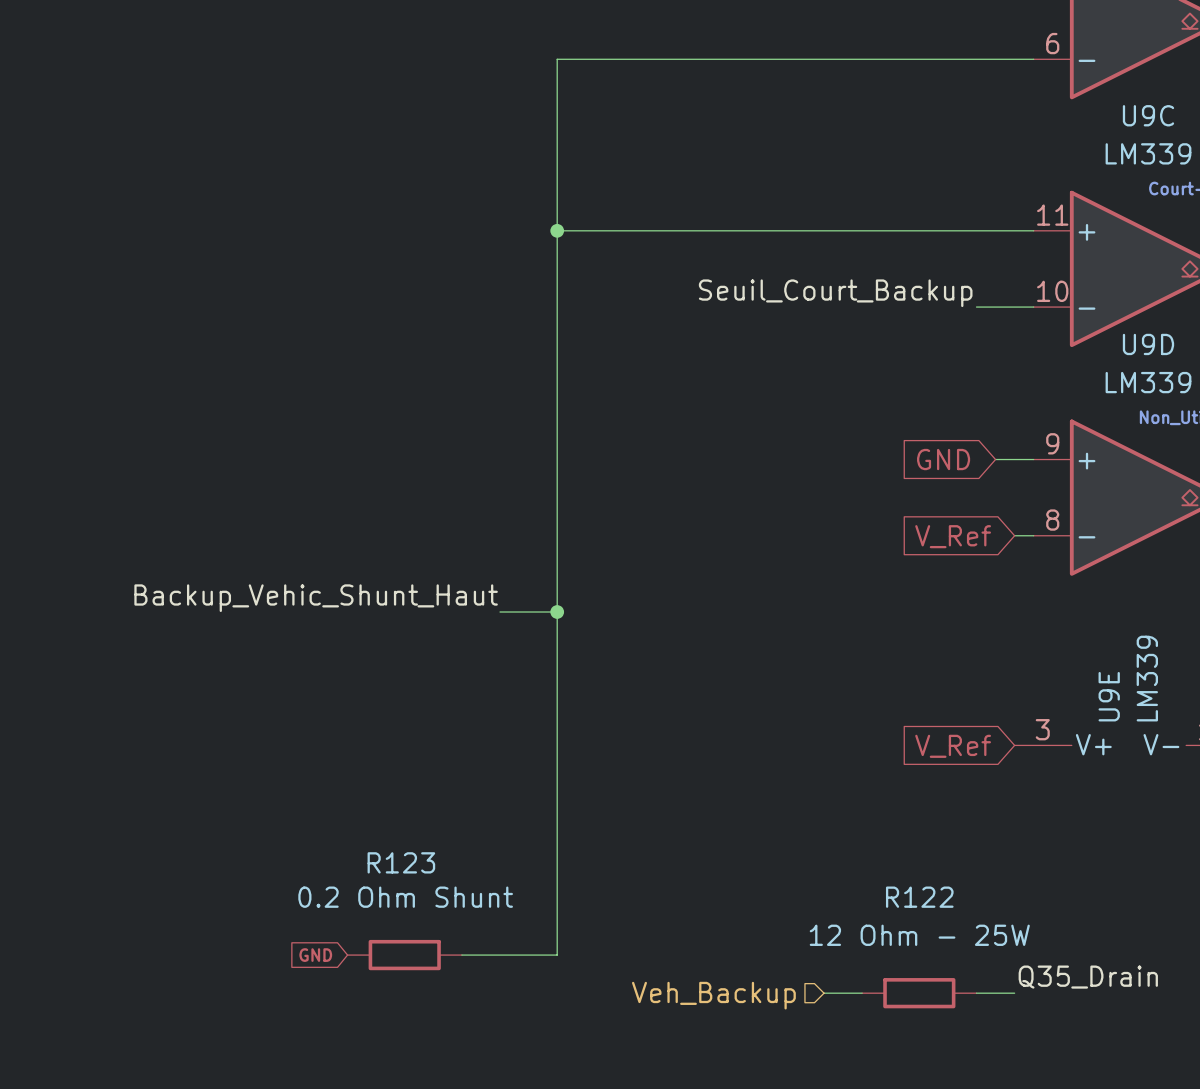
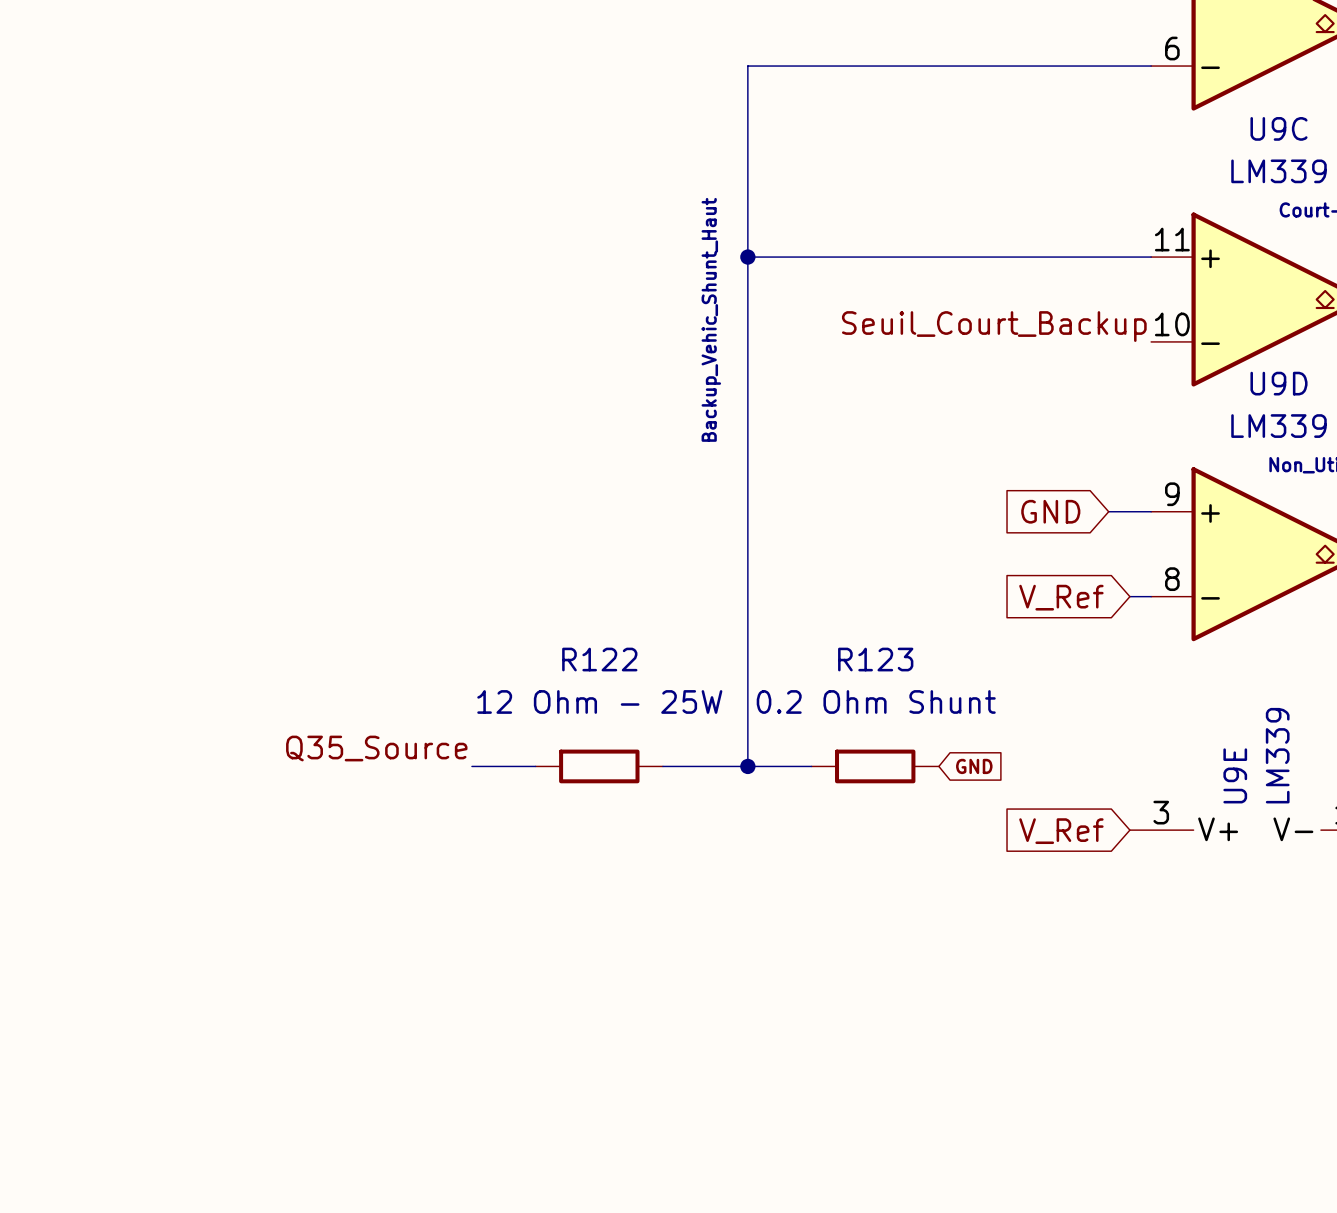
wire: (671, 59) (557, 59) (557, 955) (461, 955) -> (747, 66) (747, 766)
wire: (557, 230) (671, 230) -> none
junction: (557, 230) -> none
junction: none -> (747, 257)
text: none -> Backup_Vehic_Shunt_Haut (711, 319)
label position: Seuil_Court_Backup (835, 293) -> Seuil_Court_Backup (994, 326)
wire: (976, 307) (1033, 307) -> none
label: Backup_Vehic_Shunt_Haut (316, 598) -> none
wire: (500, 612) (557, 612) -> (471, 766) (535, 766)
junction: (557, 612) -> none
label: none -> Q35_Source (376, 748)
wire: none -> (662, 766) (811, 766)
junction: none -> (747, 766)
global label: none -> GND (974, 766)
R123 name position: R123 (401, 862) -> R123 (875, 659)
global label: GND (315, 955) -> none
R123 position: (404, 955) -> (875, 766)
label: Q35_Drain (1088, 977) -> none
wire: (824, 993) (862, 993) -> none
R122 position: (919, 993) -> (599, 766)
wire: (976, 993) (1014, 993) -> none
hierarchical label: Veh_Backup (713, 995) -> none

